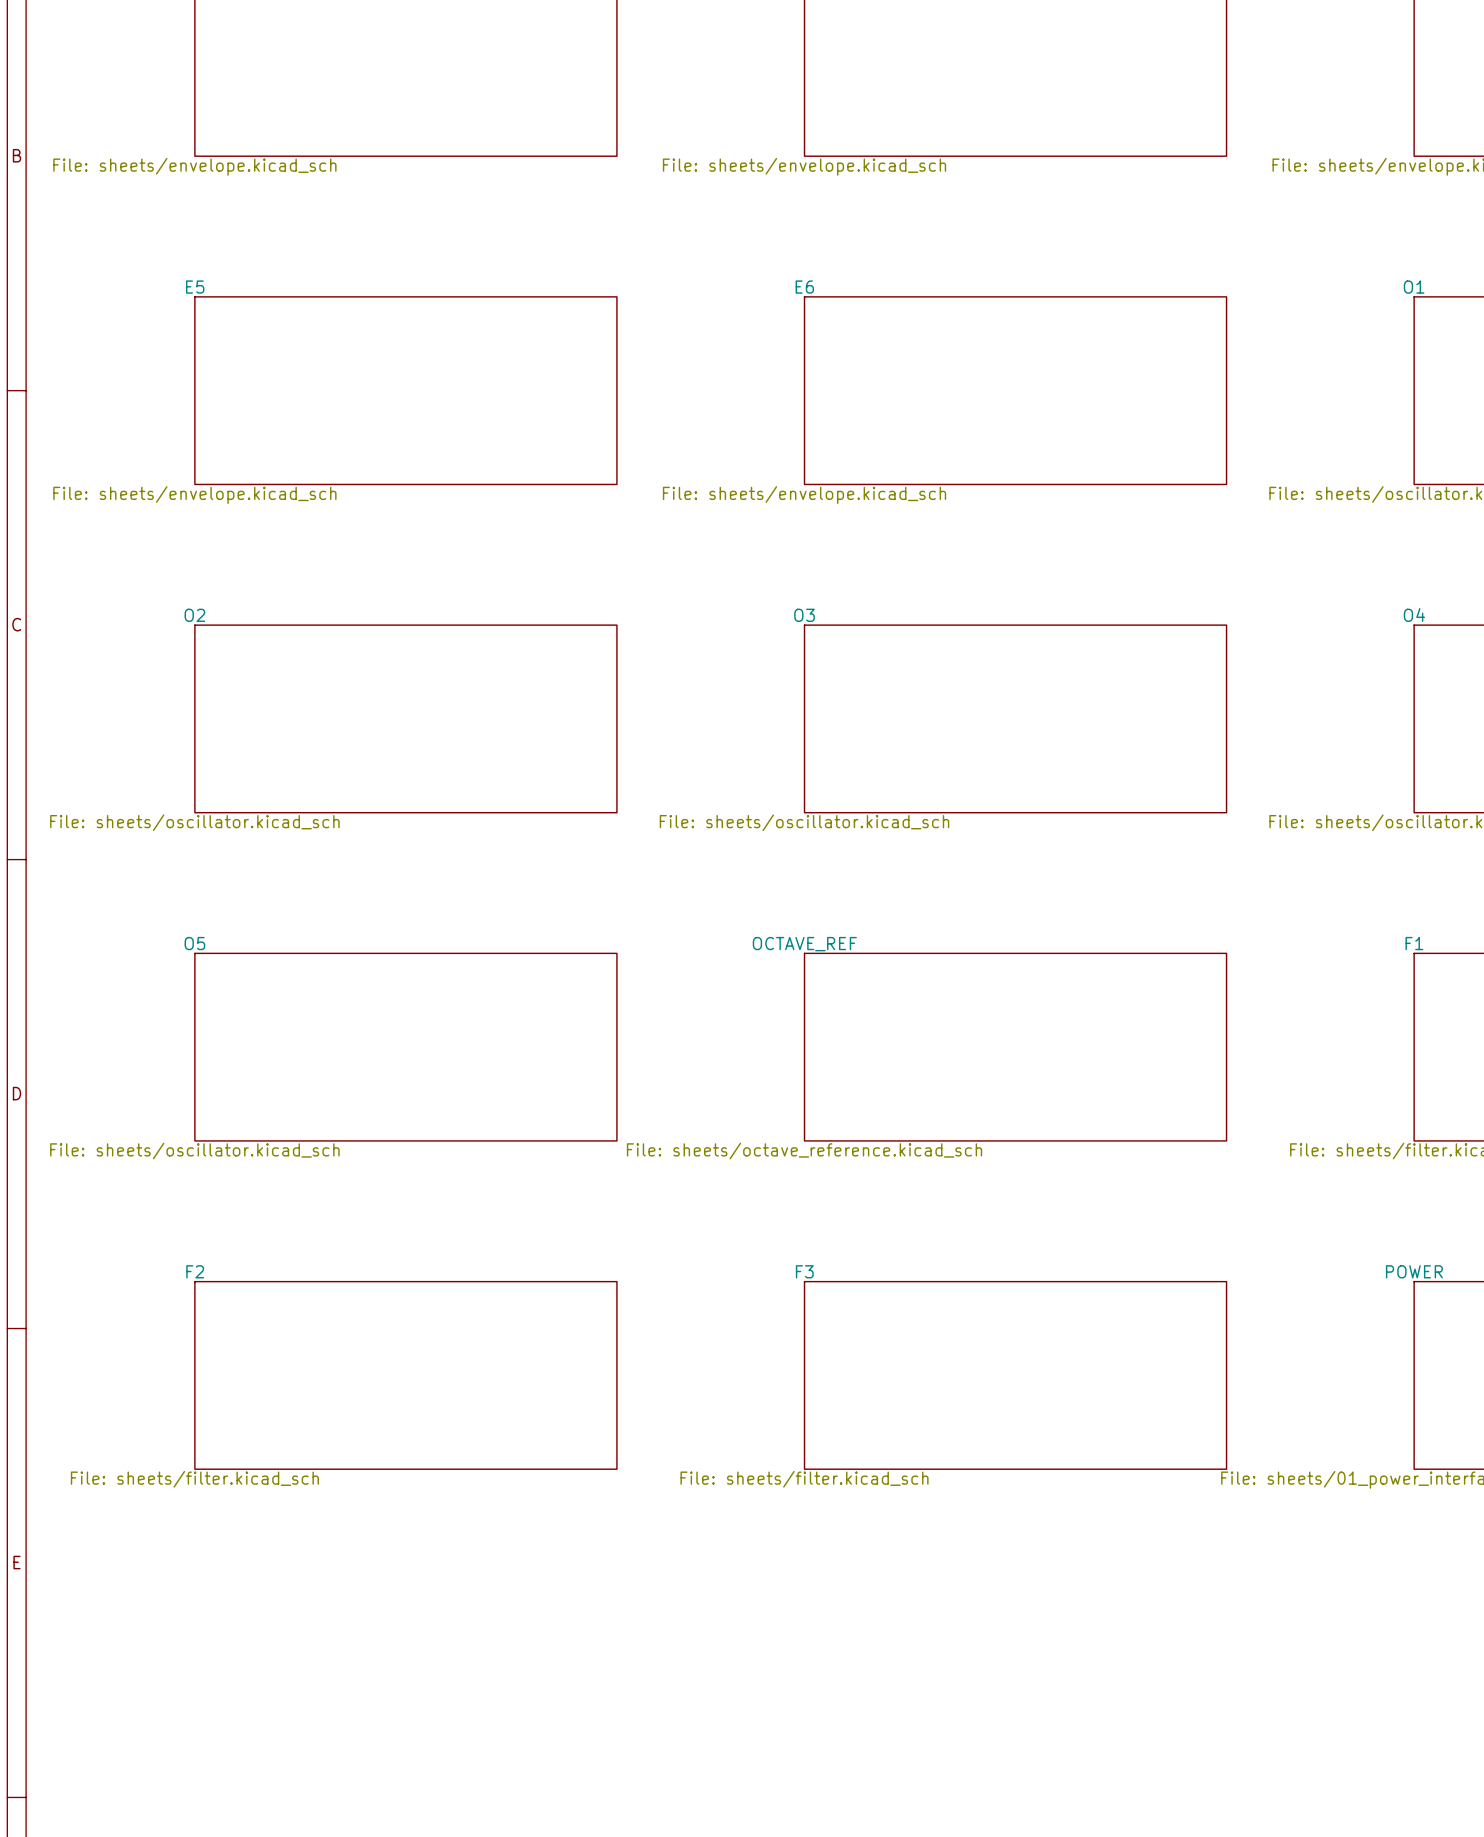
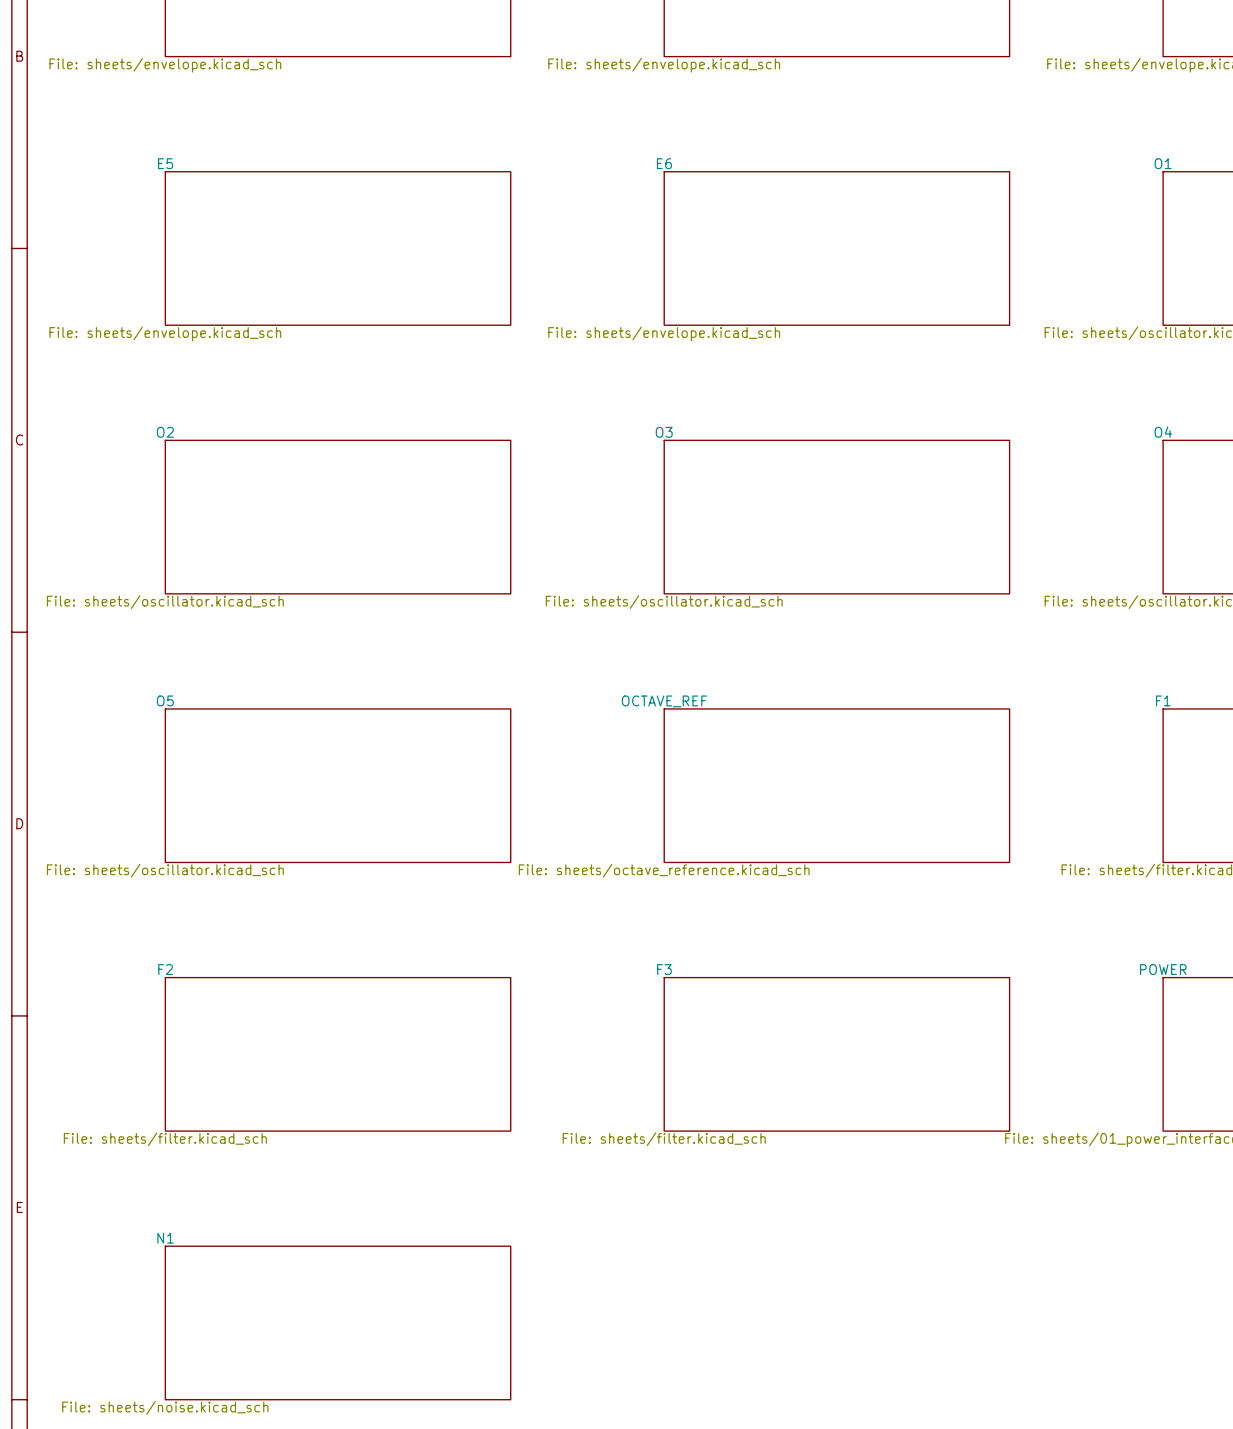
sheet N1: none -> File: sheets/noise.kicad_sch (338, 1322)

